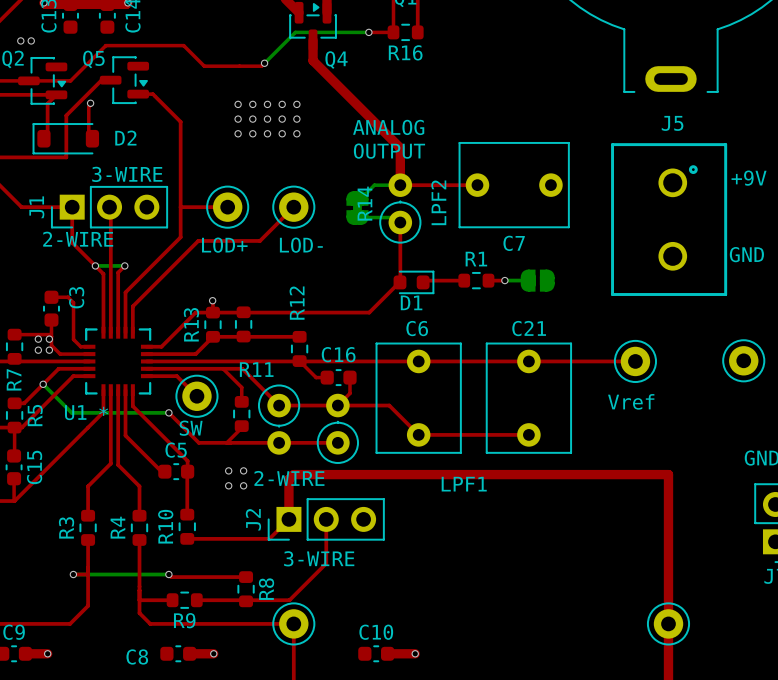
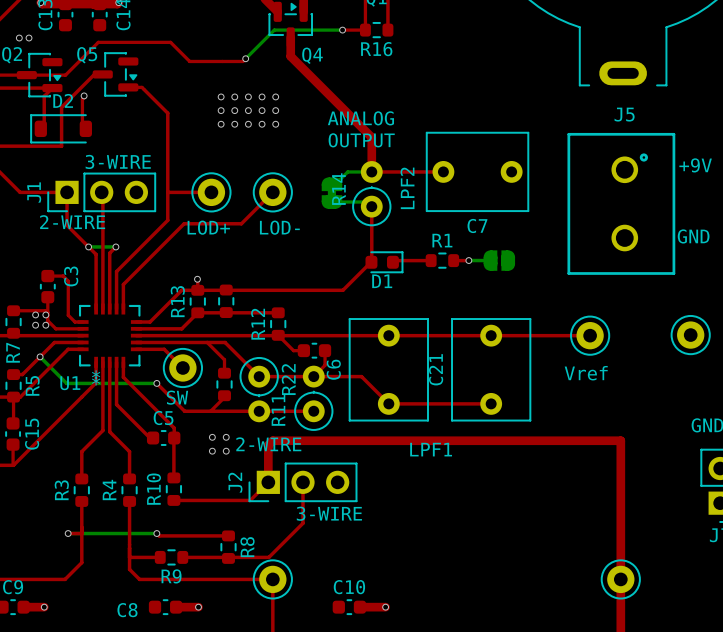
D2 name position: D2 (125, 138) -> D2 (63, 100)
R12 name position: R12 (297, 303) -> R12 (258, 324)
U1 footprint: [83, 326, 153, 397] -> [77, 303, 142, 368]
C6 name rotation: 0° (417, 328) -> 90° counterclockwise (333, 369)
C6 name position: C6 (417, 328) -> C6 (333, 369)
C21 name rotation: 0° (529, 328) -> 90° counterclockwise (436, 369)
C21 name position: C21 (529, 328) -> C21 (436, 369)
C16 name: C16 (338, 354) -> none
R11 name rotation: 0° (256, 369) -> 90° counterclockwise (278, 410)
R11 name position: R11 (256, 369) -> R11 (278, 410)
R22 name: none -> R22 (288, 379)
text position: 3-WIRE (319, 558) -> 3-WIRE (329, 513)

